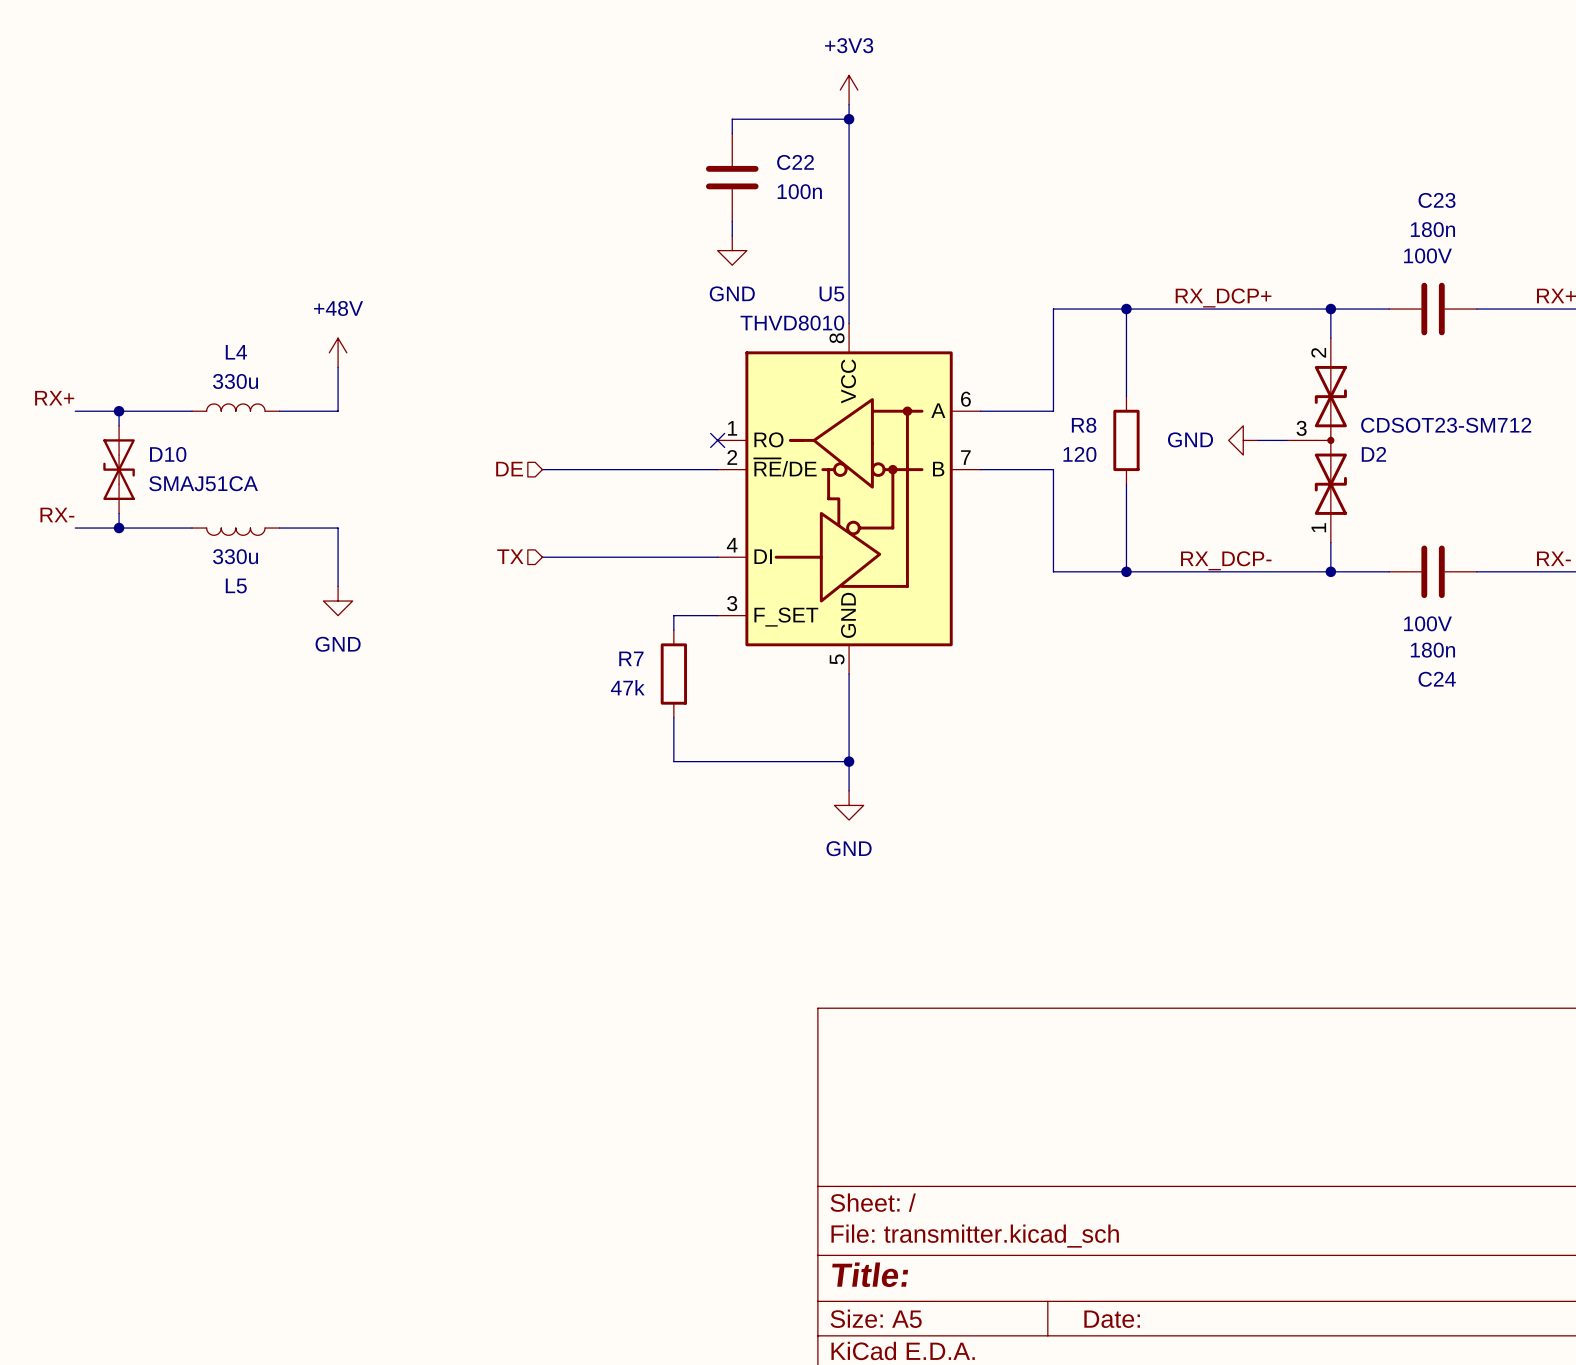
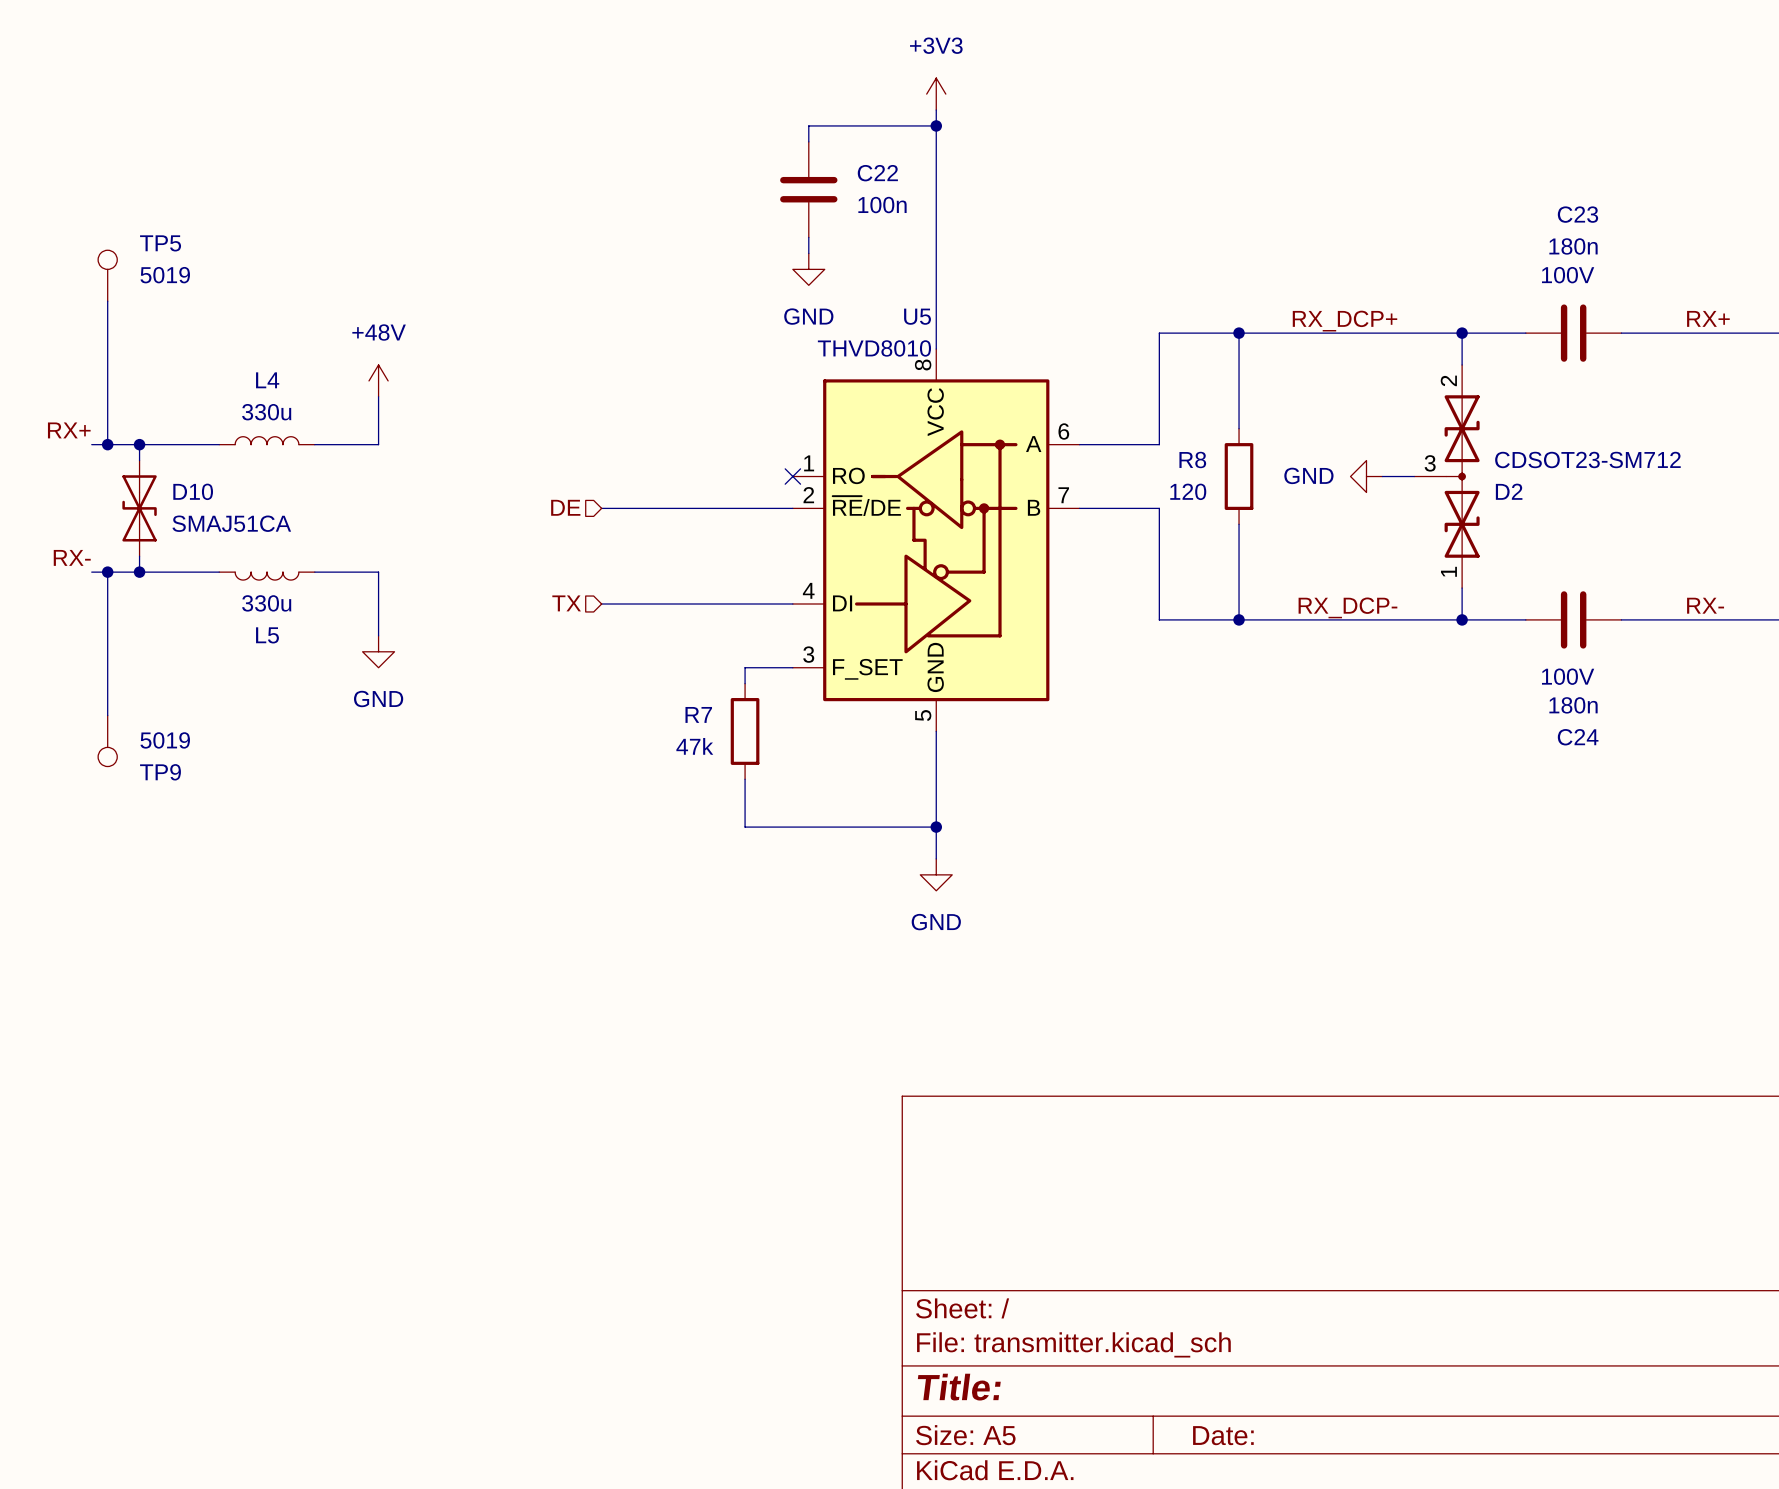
TP5: none -> 5019 (107, 275)
wire: none -> (107, 301) (107, 444)
junction: none -> (107, 444)
wire: none -> (107, 572) (107, 715)
junction: none -> (107, 572)
TP9: none -> 5019 (107, 741)

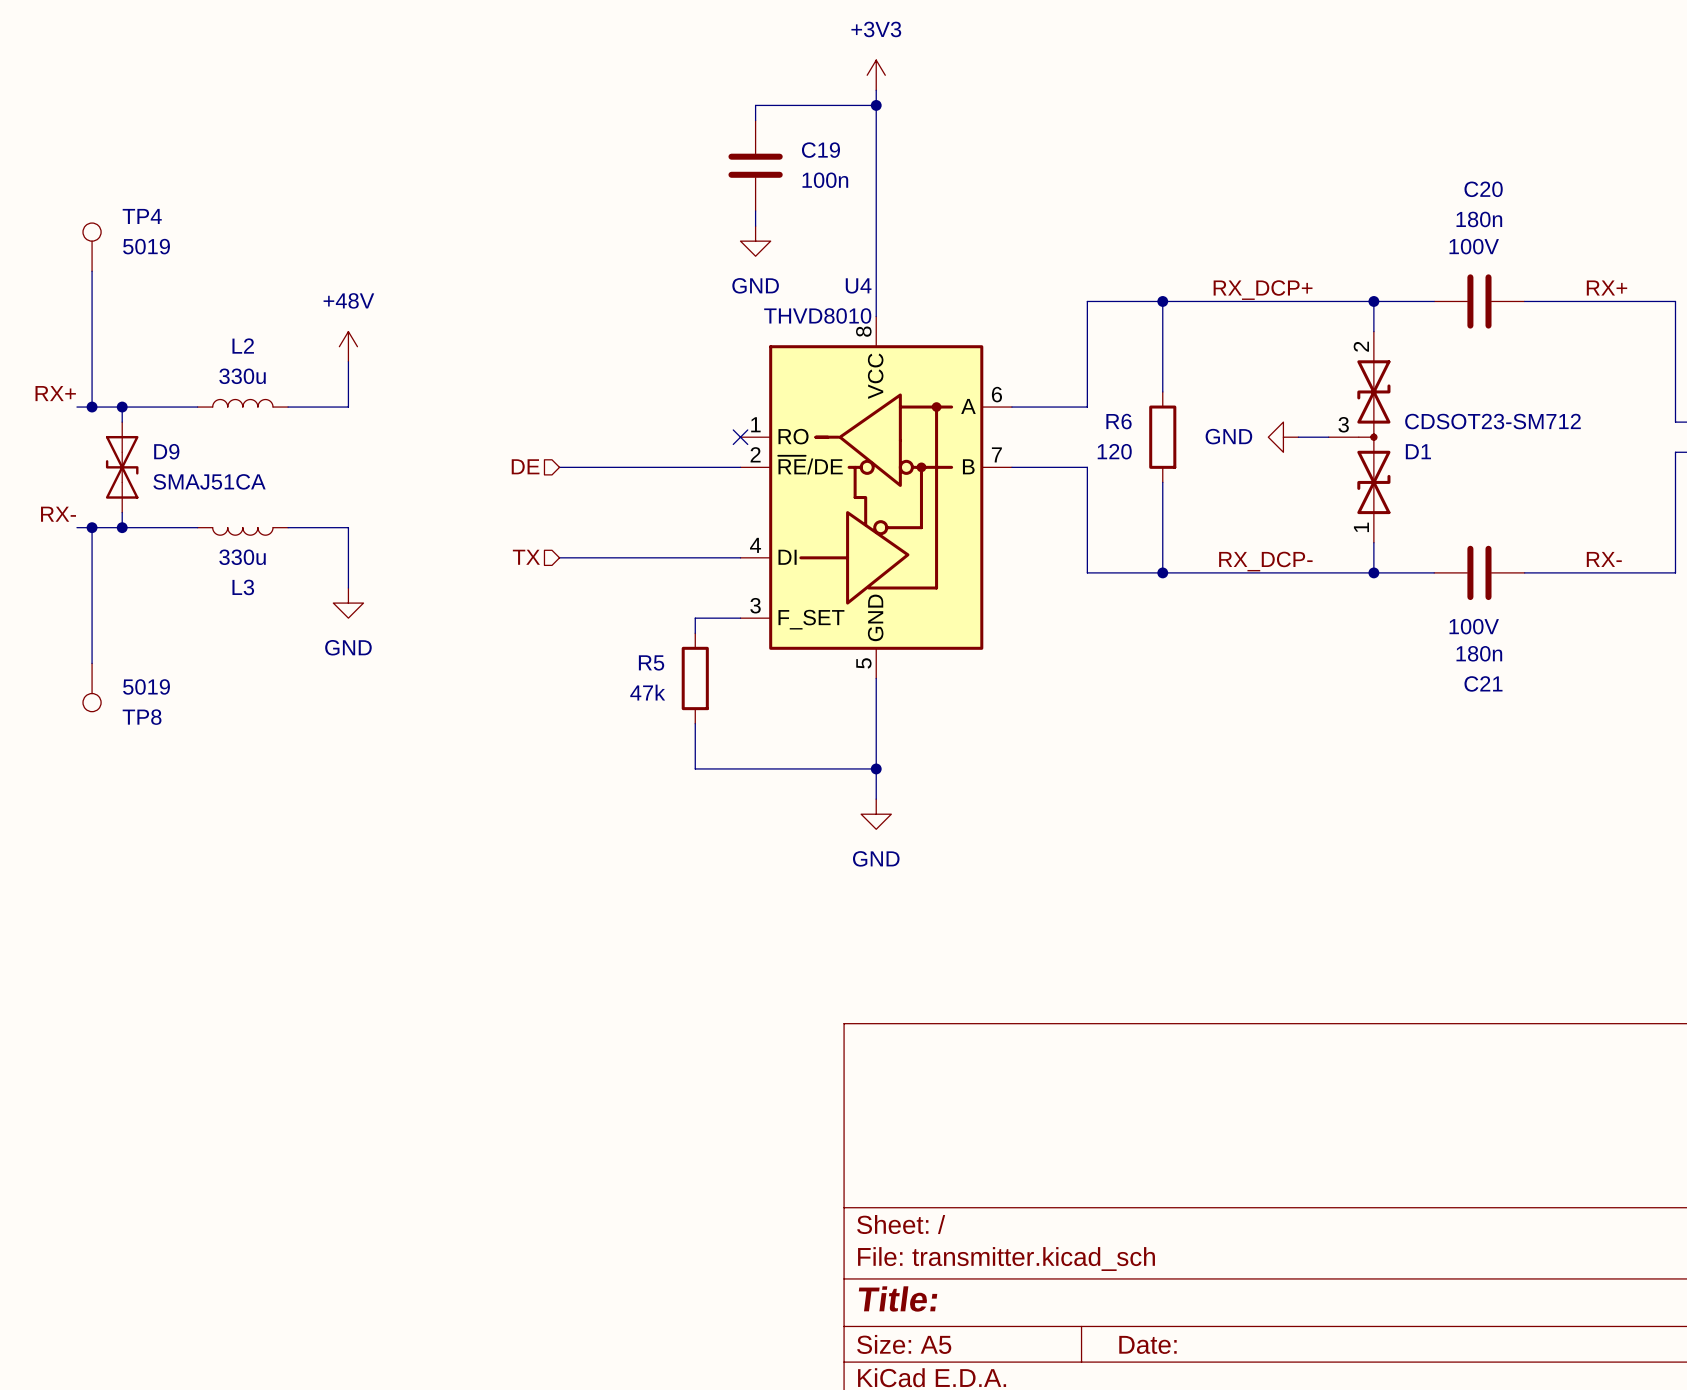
C22 name: C22 (877, 173) -> C19 (820, 150)
C23 name: C23 (1577, 214) -> C20 (1483, 189)
TP5 name: TP5 (160, 243) -> TP4 (142, 216)
U5 name: U5 (917, 316) -> U4 (858, 285)
L4 name: L4 (267, 380) -> L2 (243, 346)
R8 name: R8 (1192, 459) -> R6 (1119, 421)
D10 name: D10 (193, 491) -> D9 (166, 451)
D2 name: D2 (1509, 491) -> D1 (1418, 451)
L5 name: L5 (267, 635) -> L3 (243, 587)
R7 name: R7 (698, 714) -> R5 (651, 662)
C24 name: C24 (1578, 737) -> C21 (1483, 683)
TP9 name: TP9 (160, 772) -> TP8 (142, 717)

